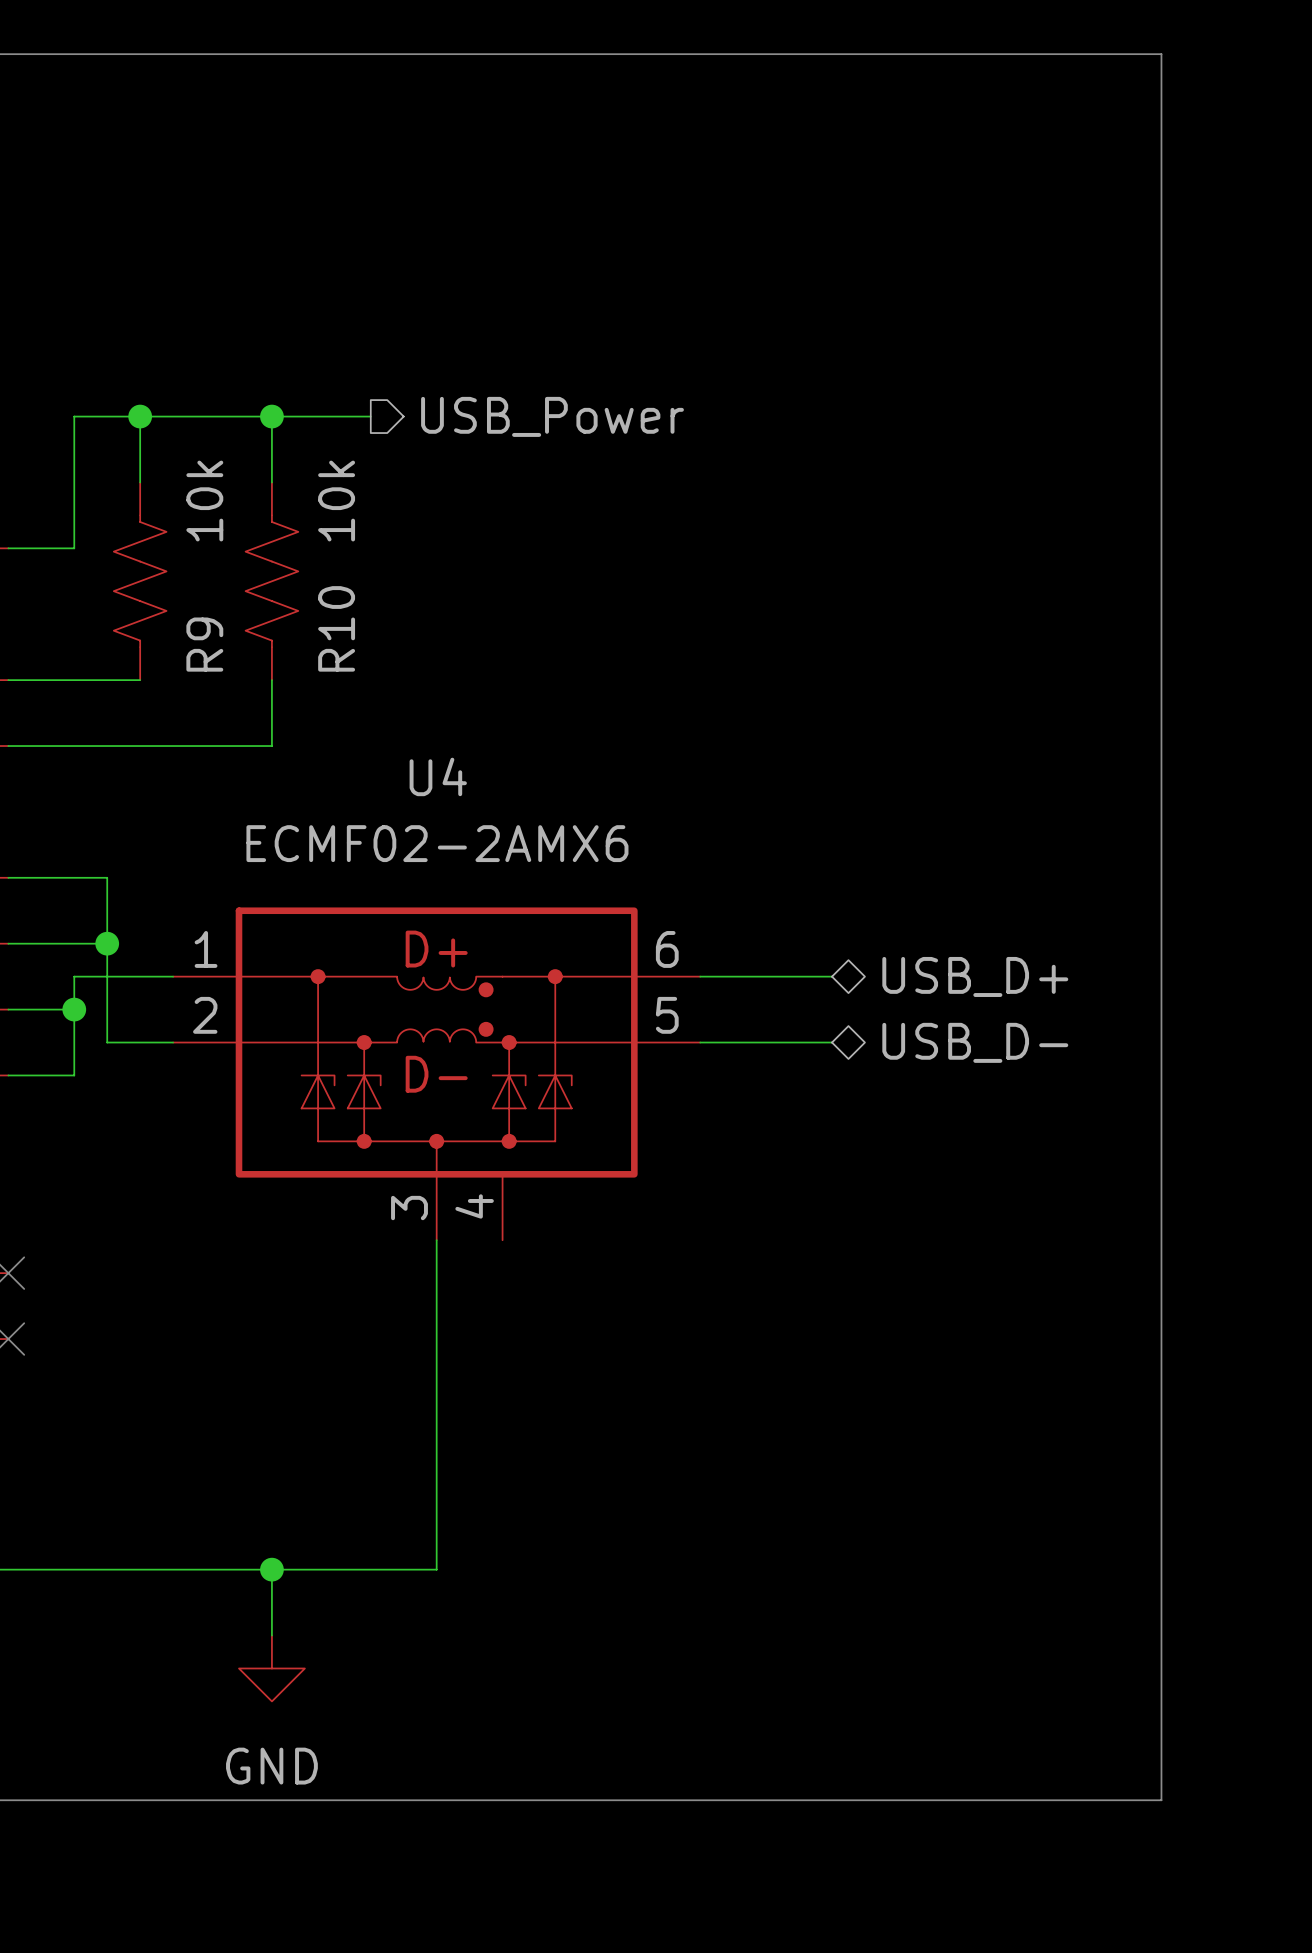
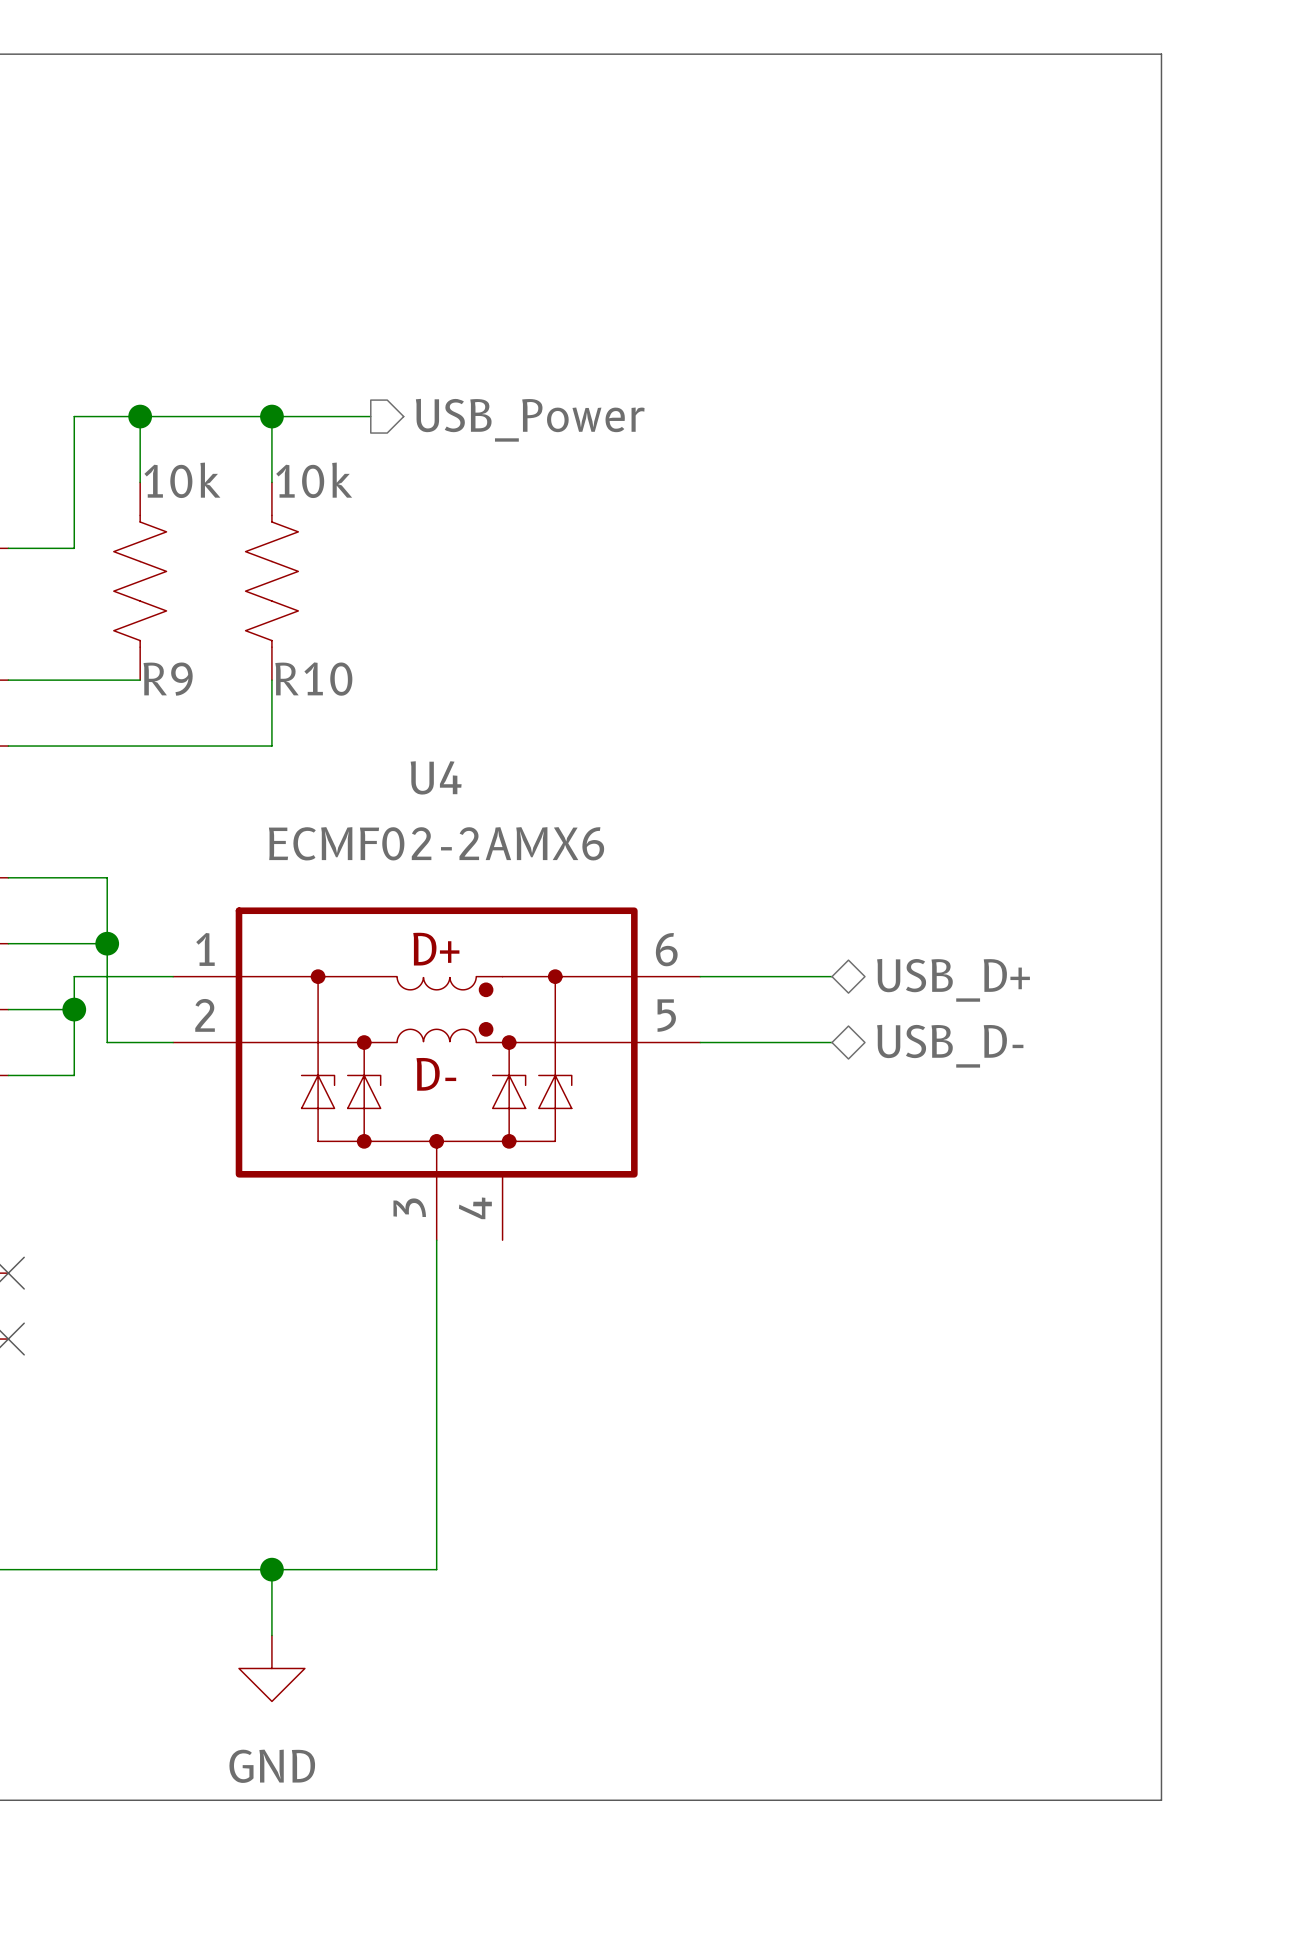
R9 value rotation: 0° (204, 501) -> 90° clockwise (182, 480)
R10 value rotation: 0° (336, 501) -> 90° clockwise (314, 480)
R10 name rotation: 0° (336, 628) -> 90° clockwise (313, 679)
R9 name rotation: 0° (204, 644) -> 90° clockwise (168, 679)

